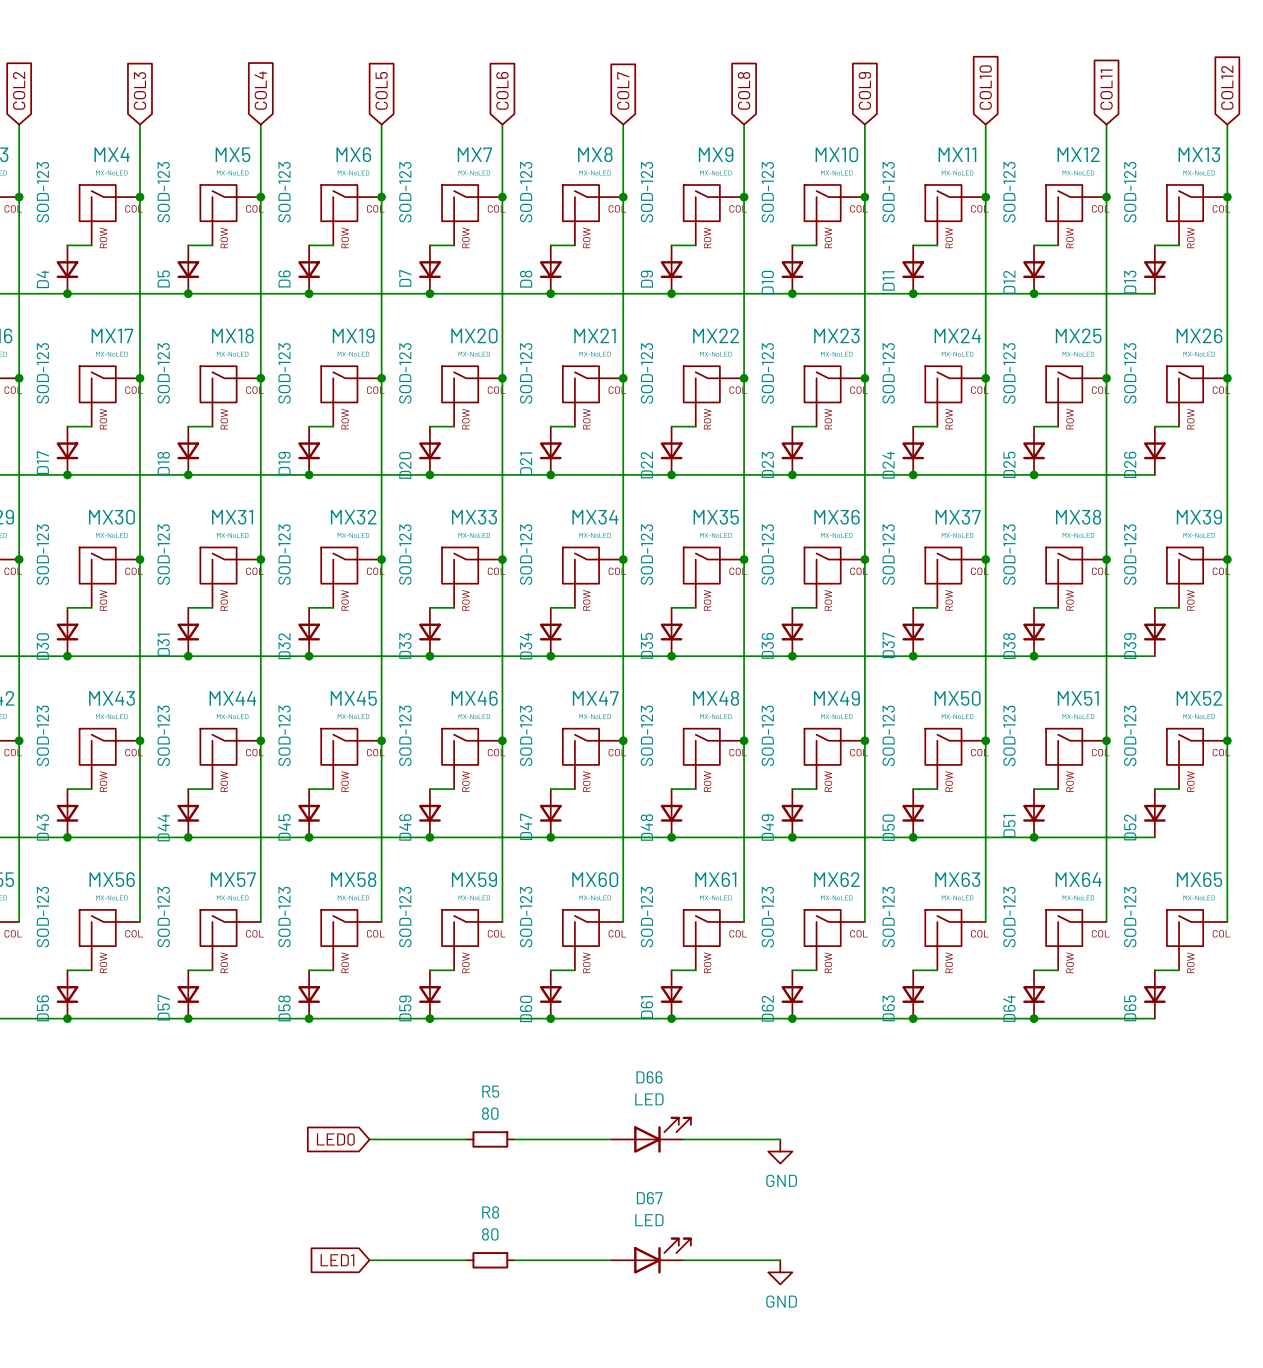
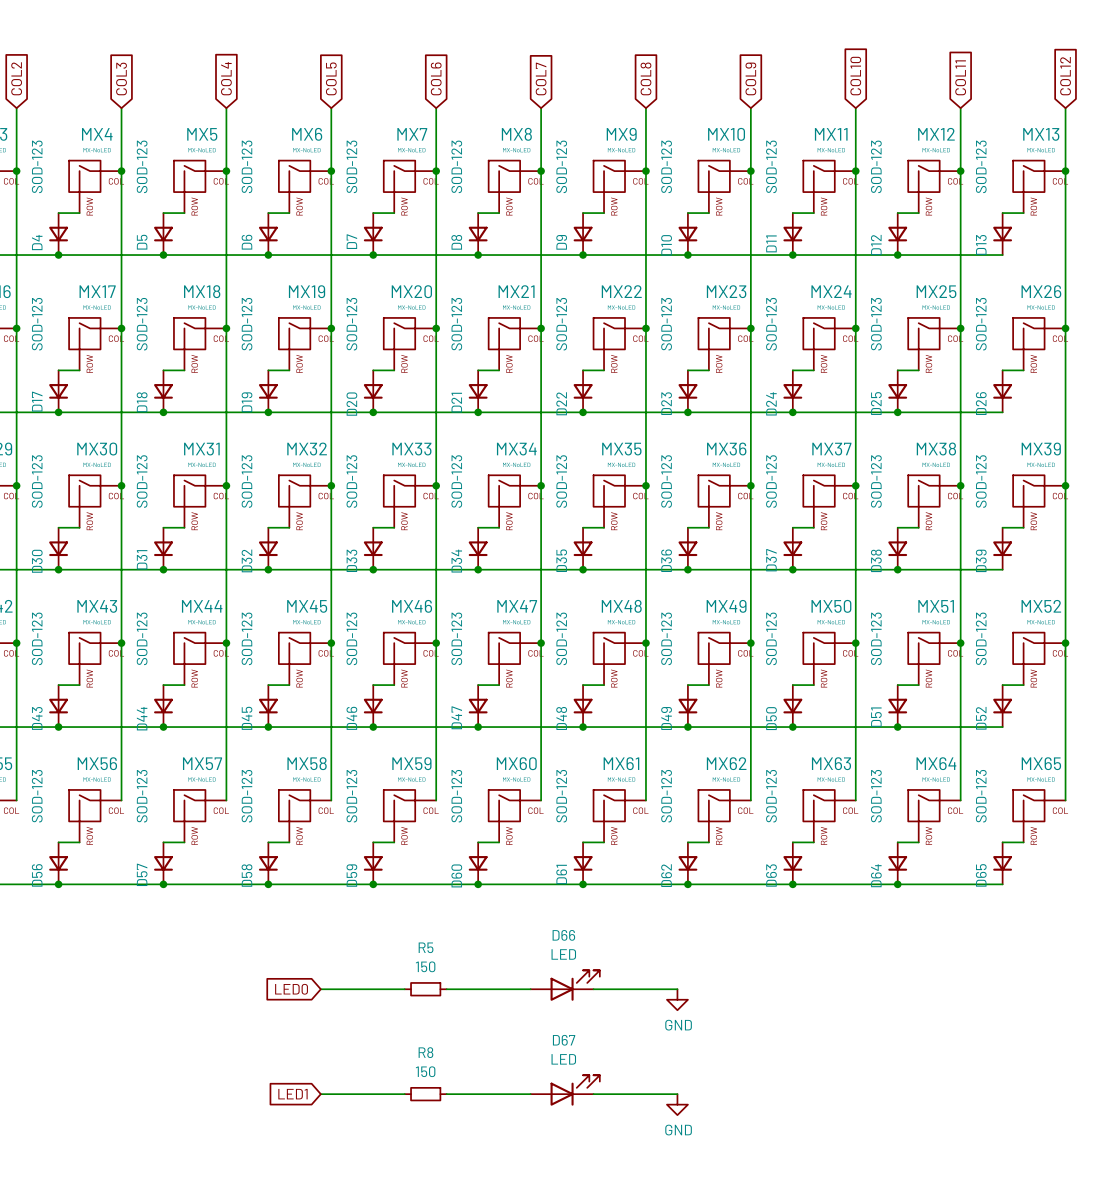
R5 value: 80 (490, 1113) -> 150 (425, 966)
R8 value: 80 (490, 1234) -> 150 (425, 1071)

